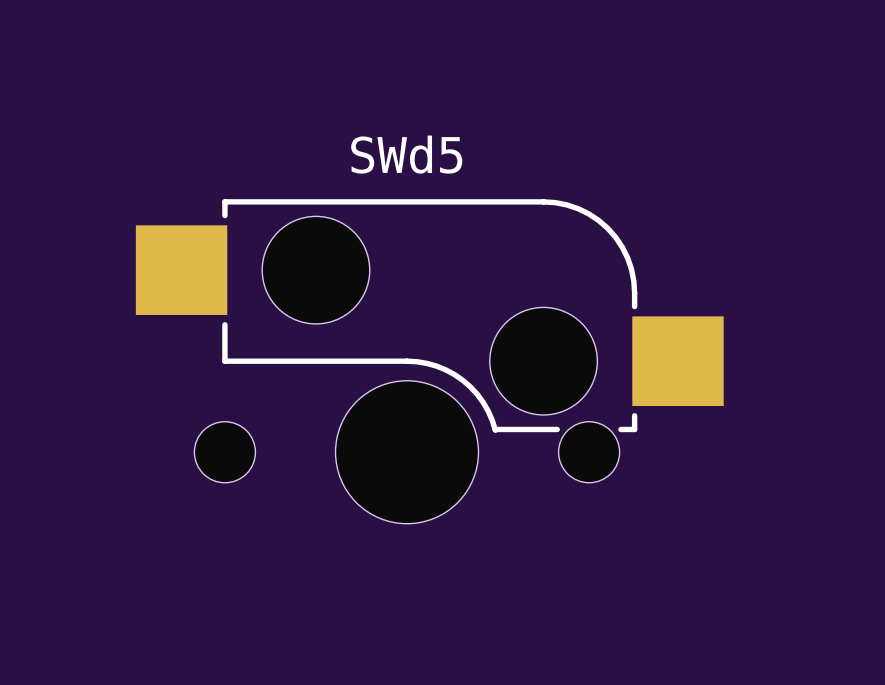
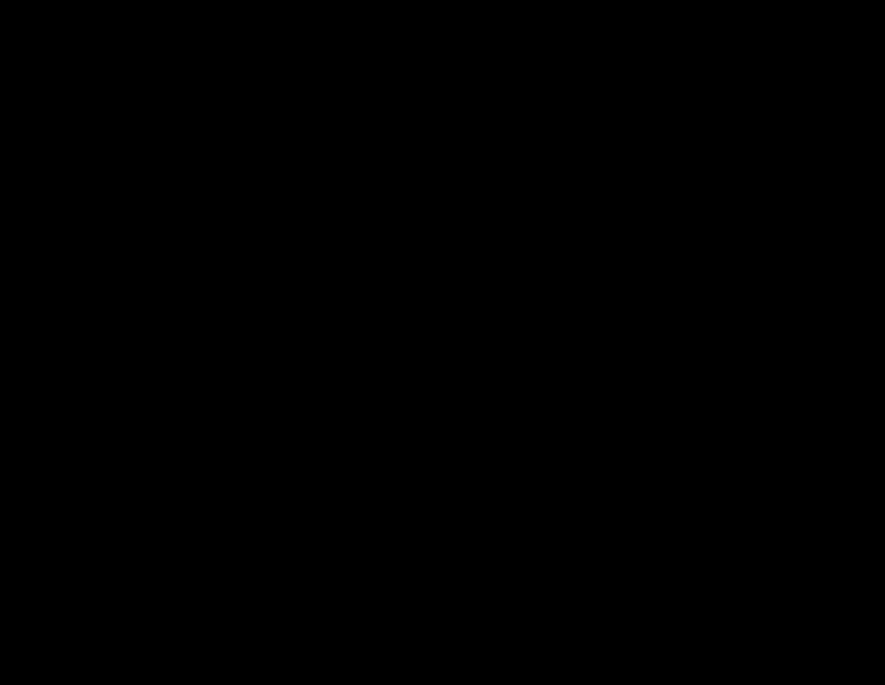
SWd5: (429, 361) -> none

